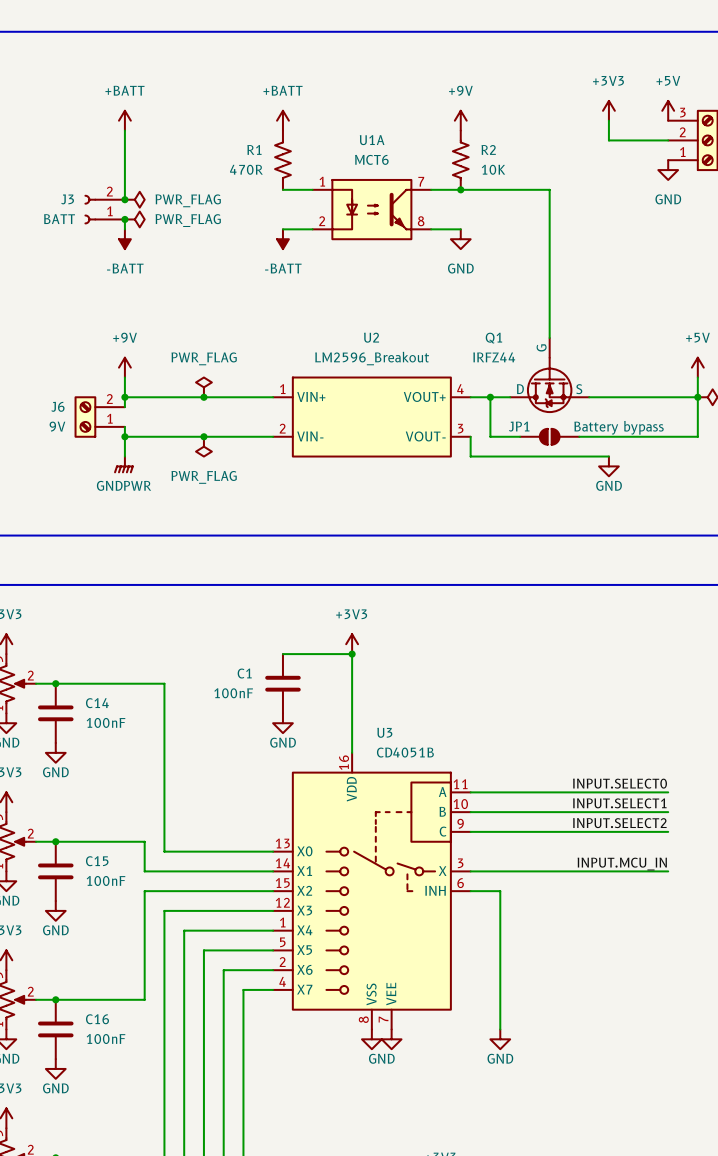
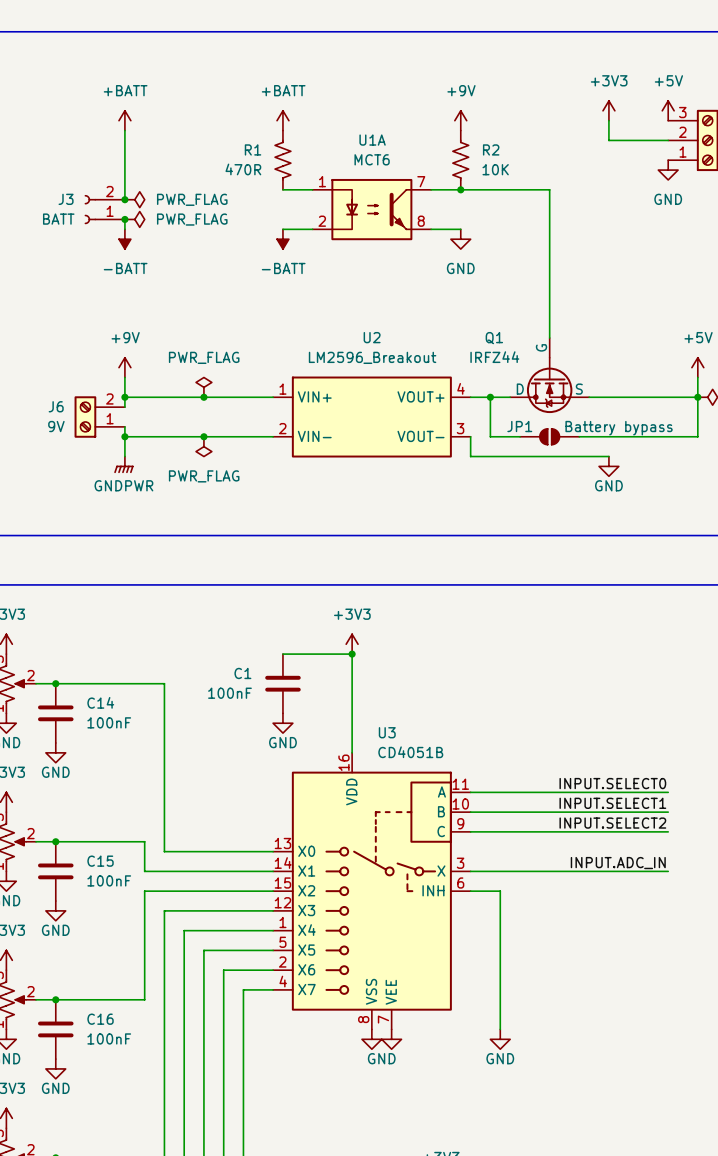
label: INPUT.MCU_IN (622, 864) -> INPUT.ADC_IN (618, 863)

